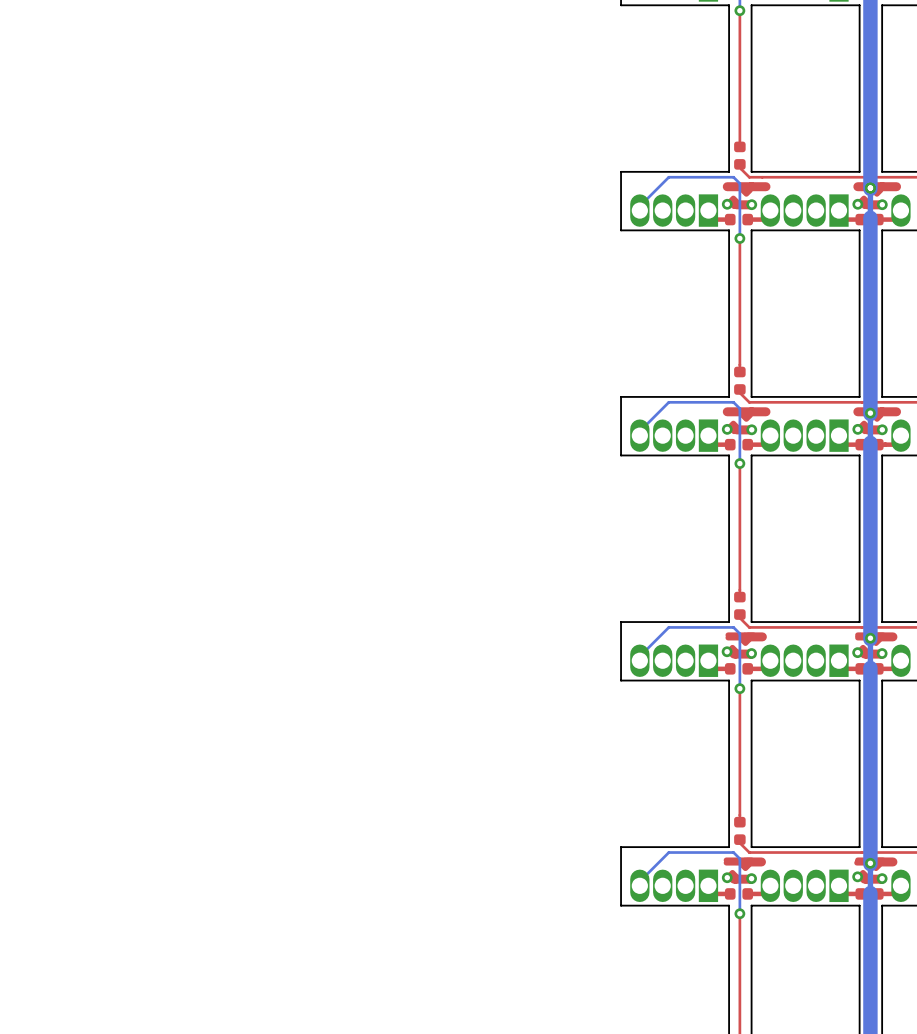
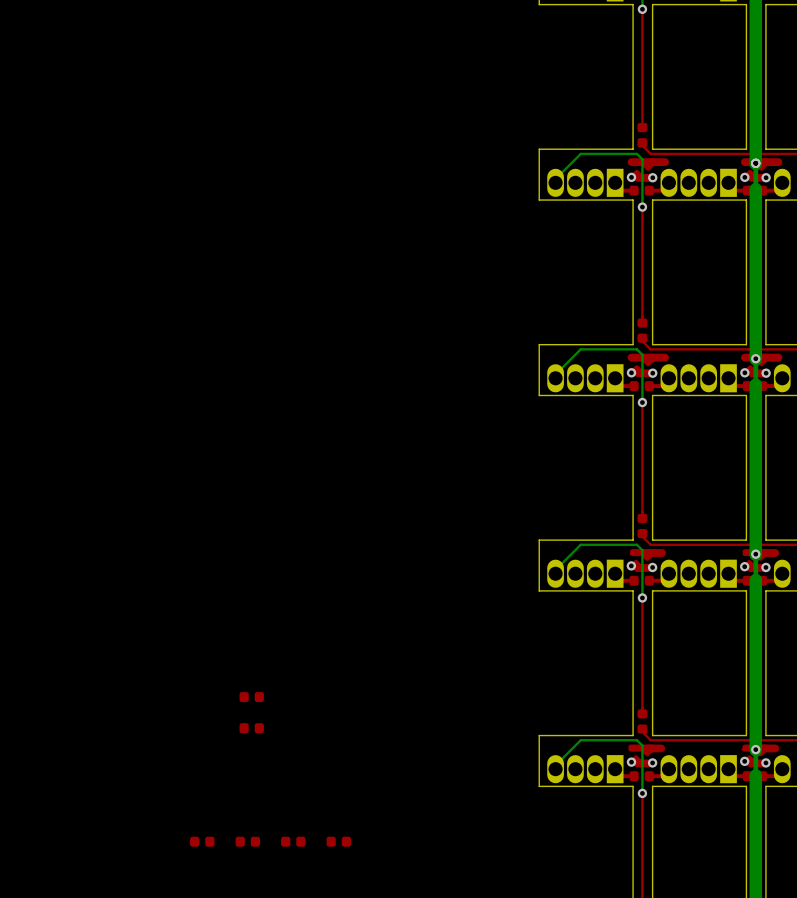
part: none -> (251, 697)
part: none -> (251, 728)
part: none -> (202, 841)
part: none -> (247, 841)
part: none -> (293, 841)
part: none -> (338, 841)

